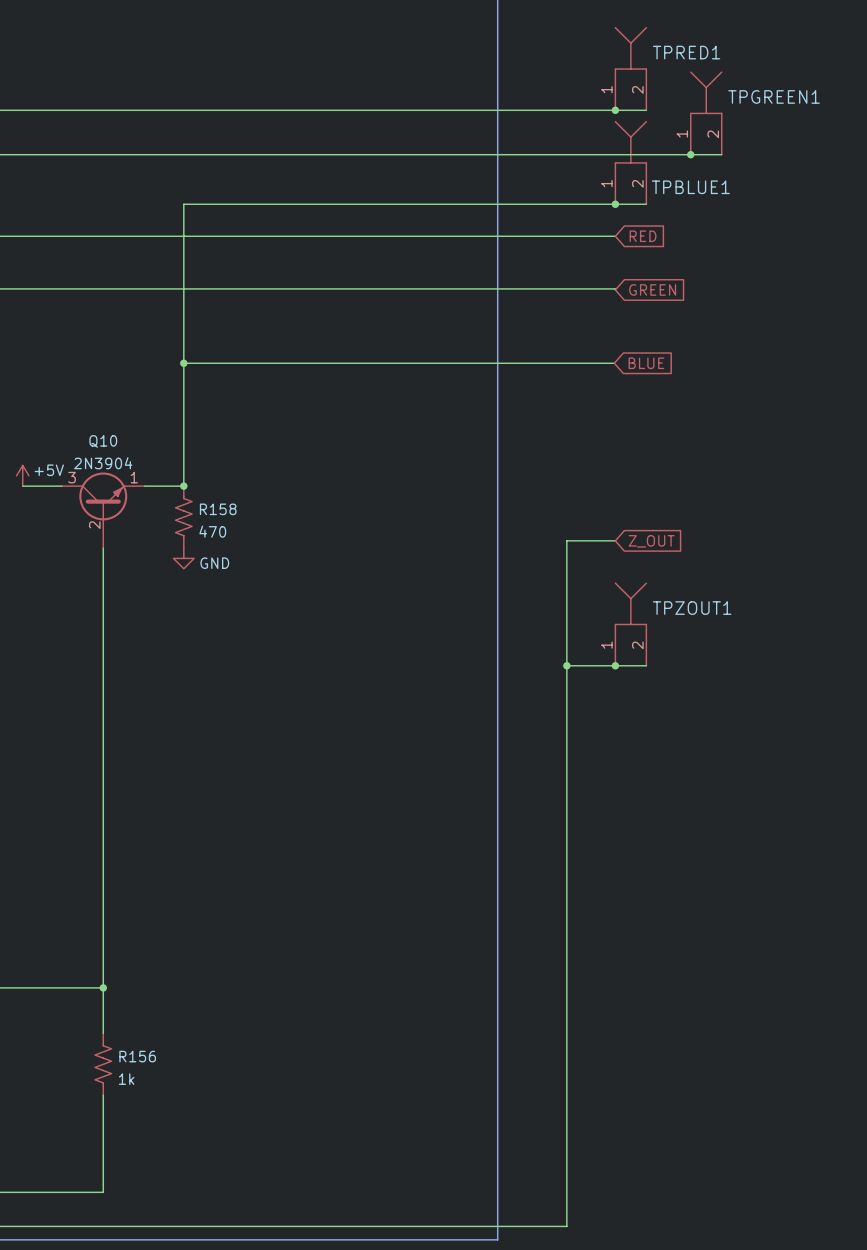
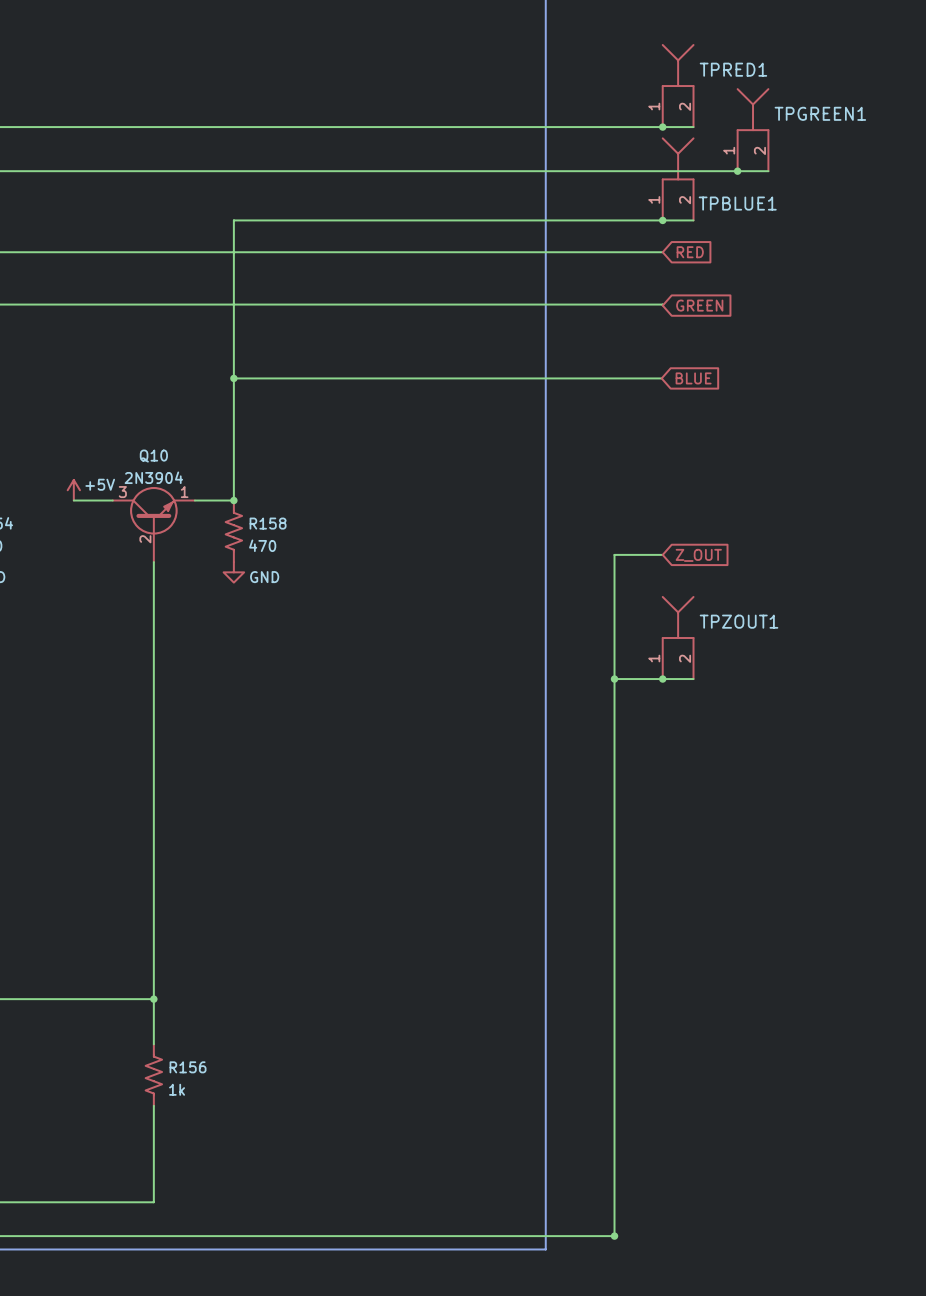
junction: none -> (614, 1236)

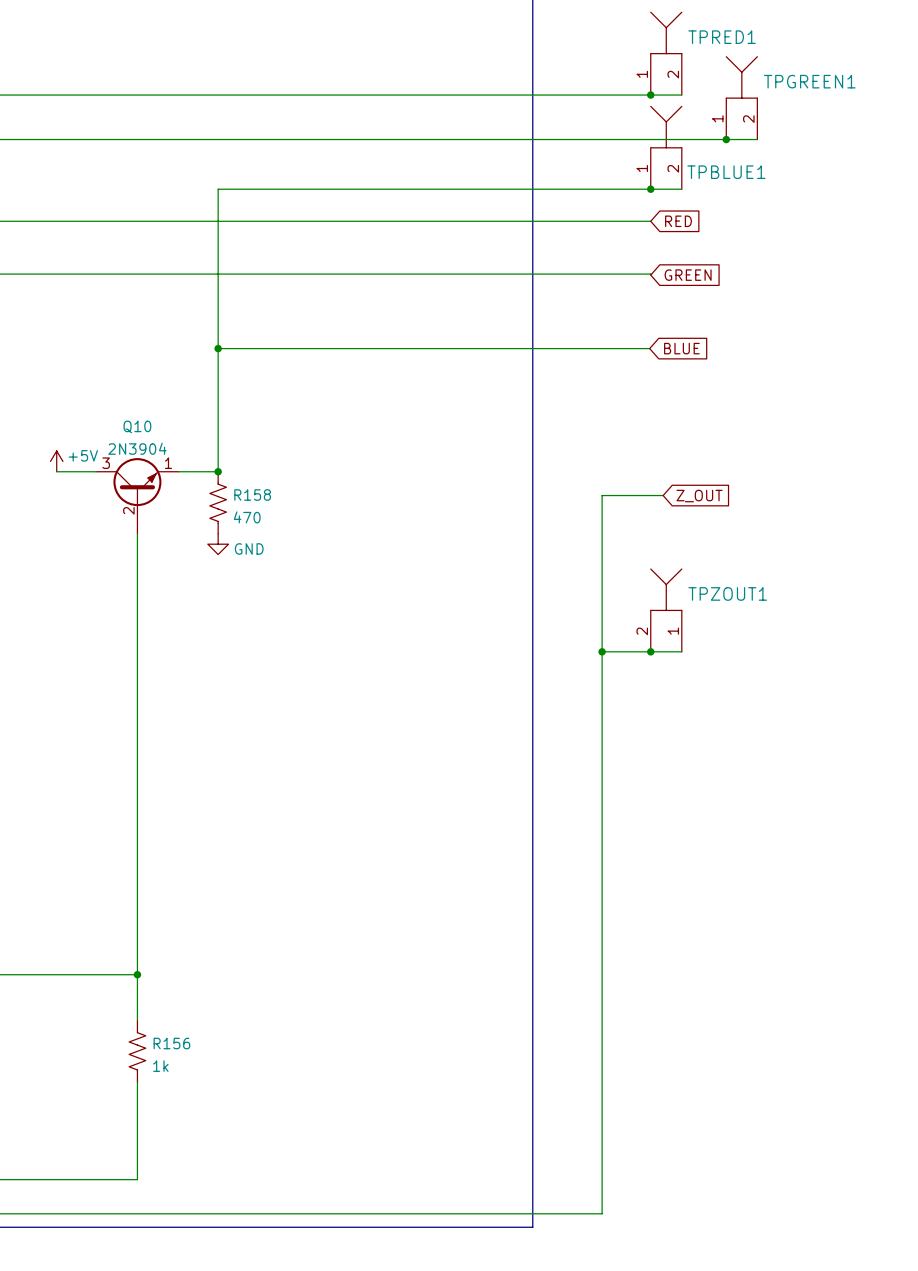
wire: (614, 554) (662, 554) -> (602, 526) (602, 495) (663, 495)
global label position: Z_OUT (698, 555) -> Z_OUT (699, 496)
TPZOUT1 flip: as is (678, 617) -> left-right (666, 589)
junction: (614, 1236) -> none

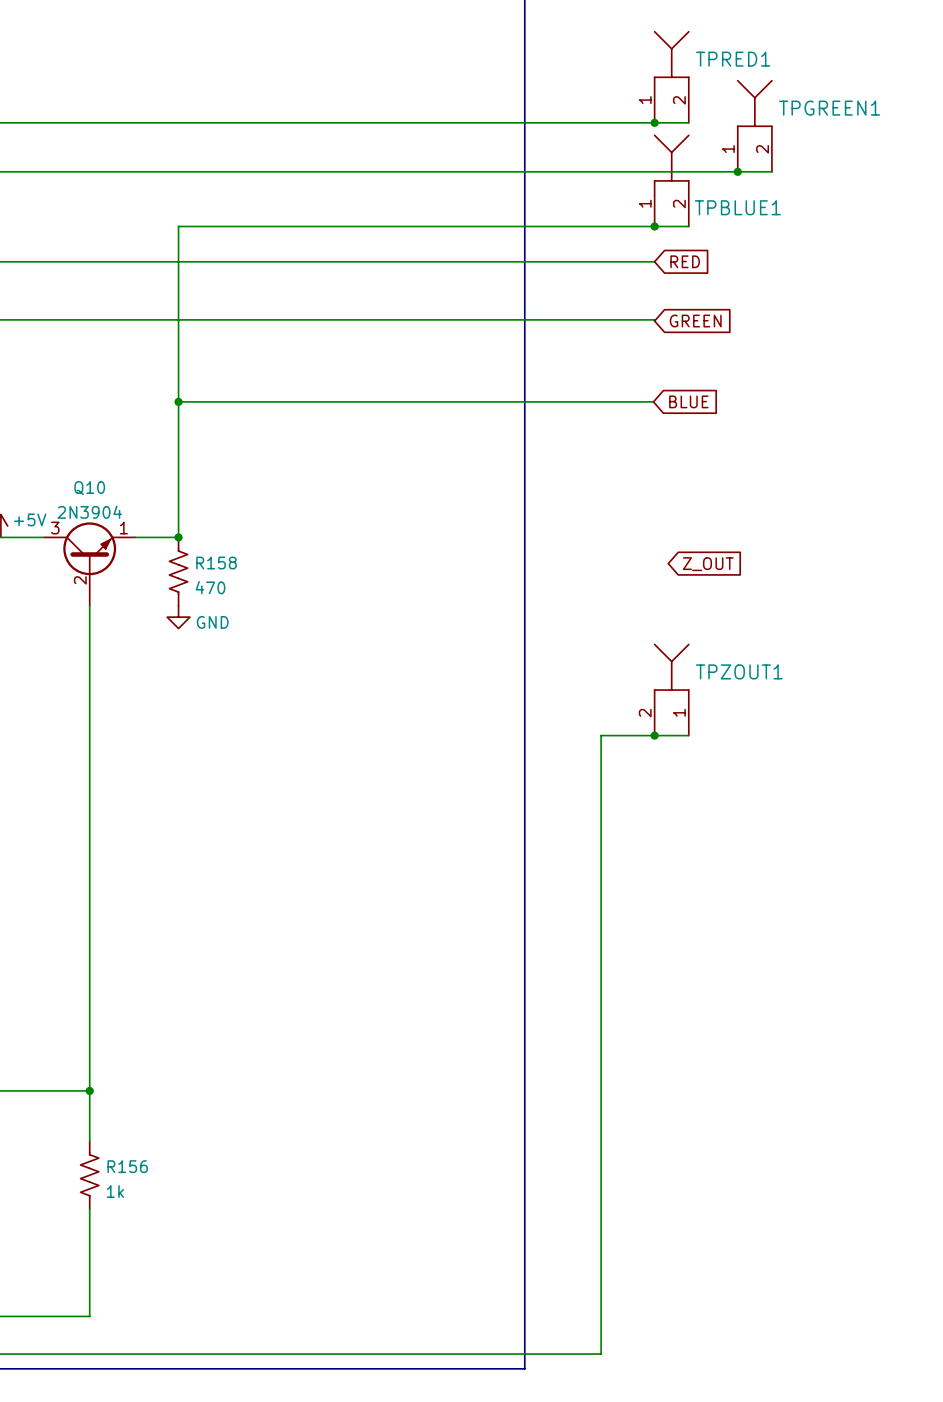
wire: (663, 495) (602, 495) (602, 651) -> none
junction: (602, 651) -> none

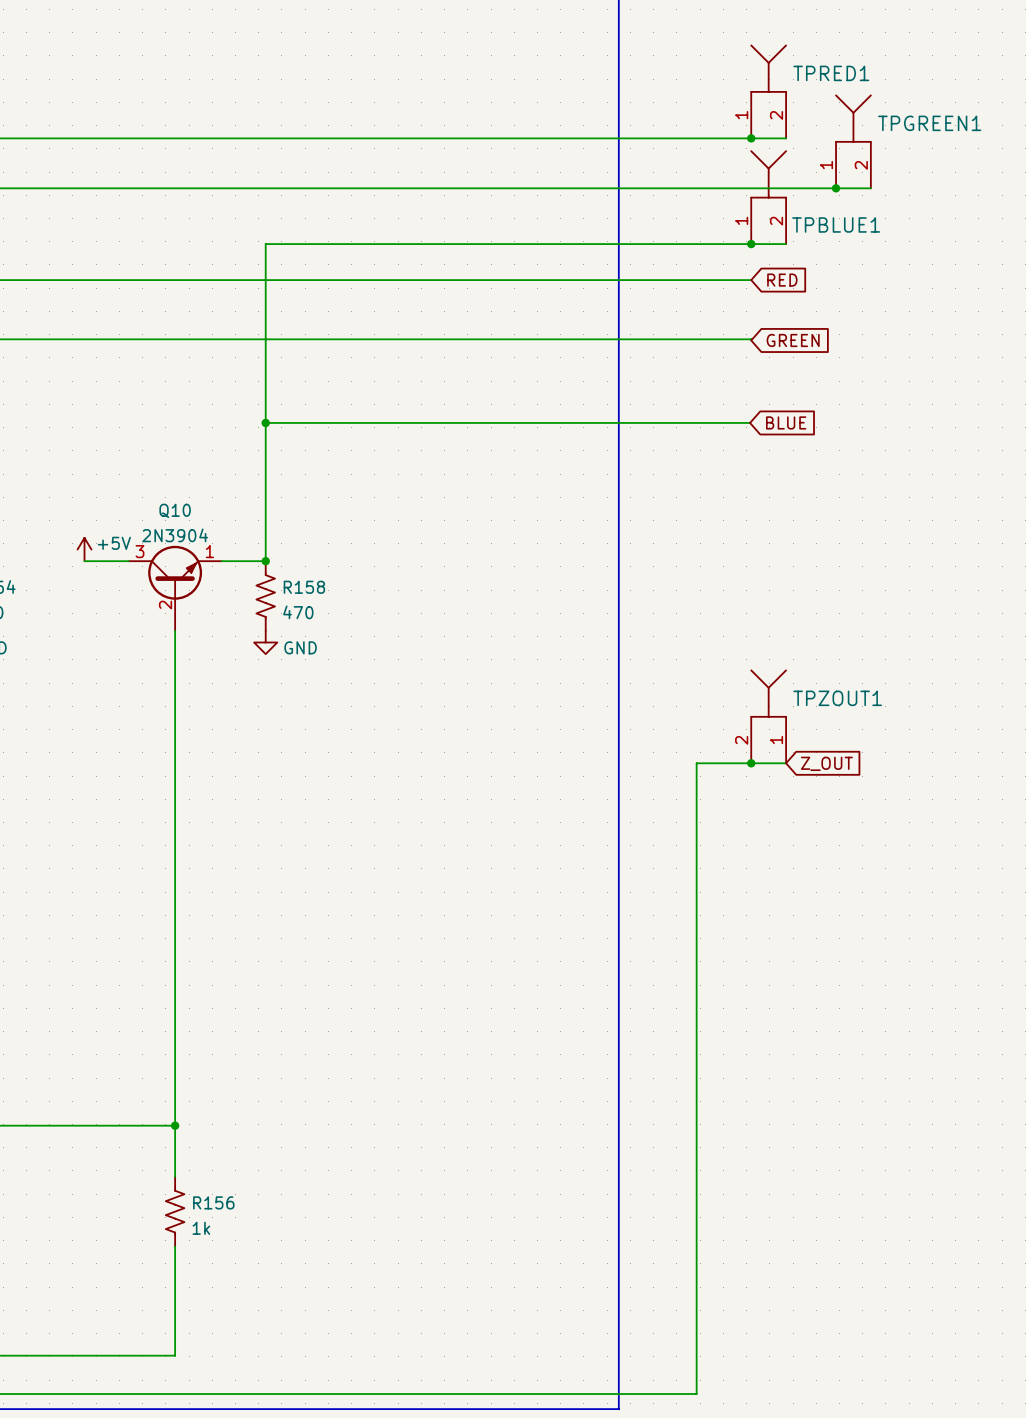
global label position: Z_OUT (708, 564) -> Z_OUT (826, 763)

